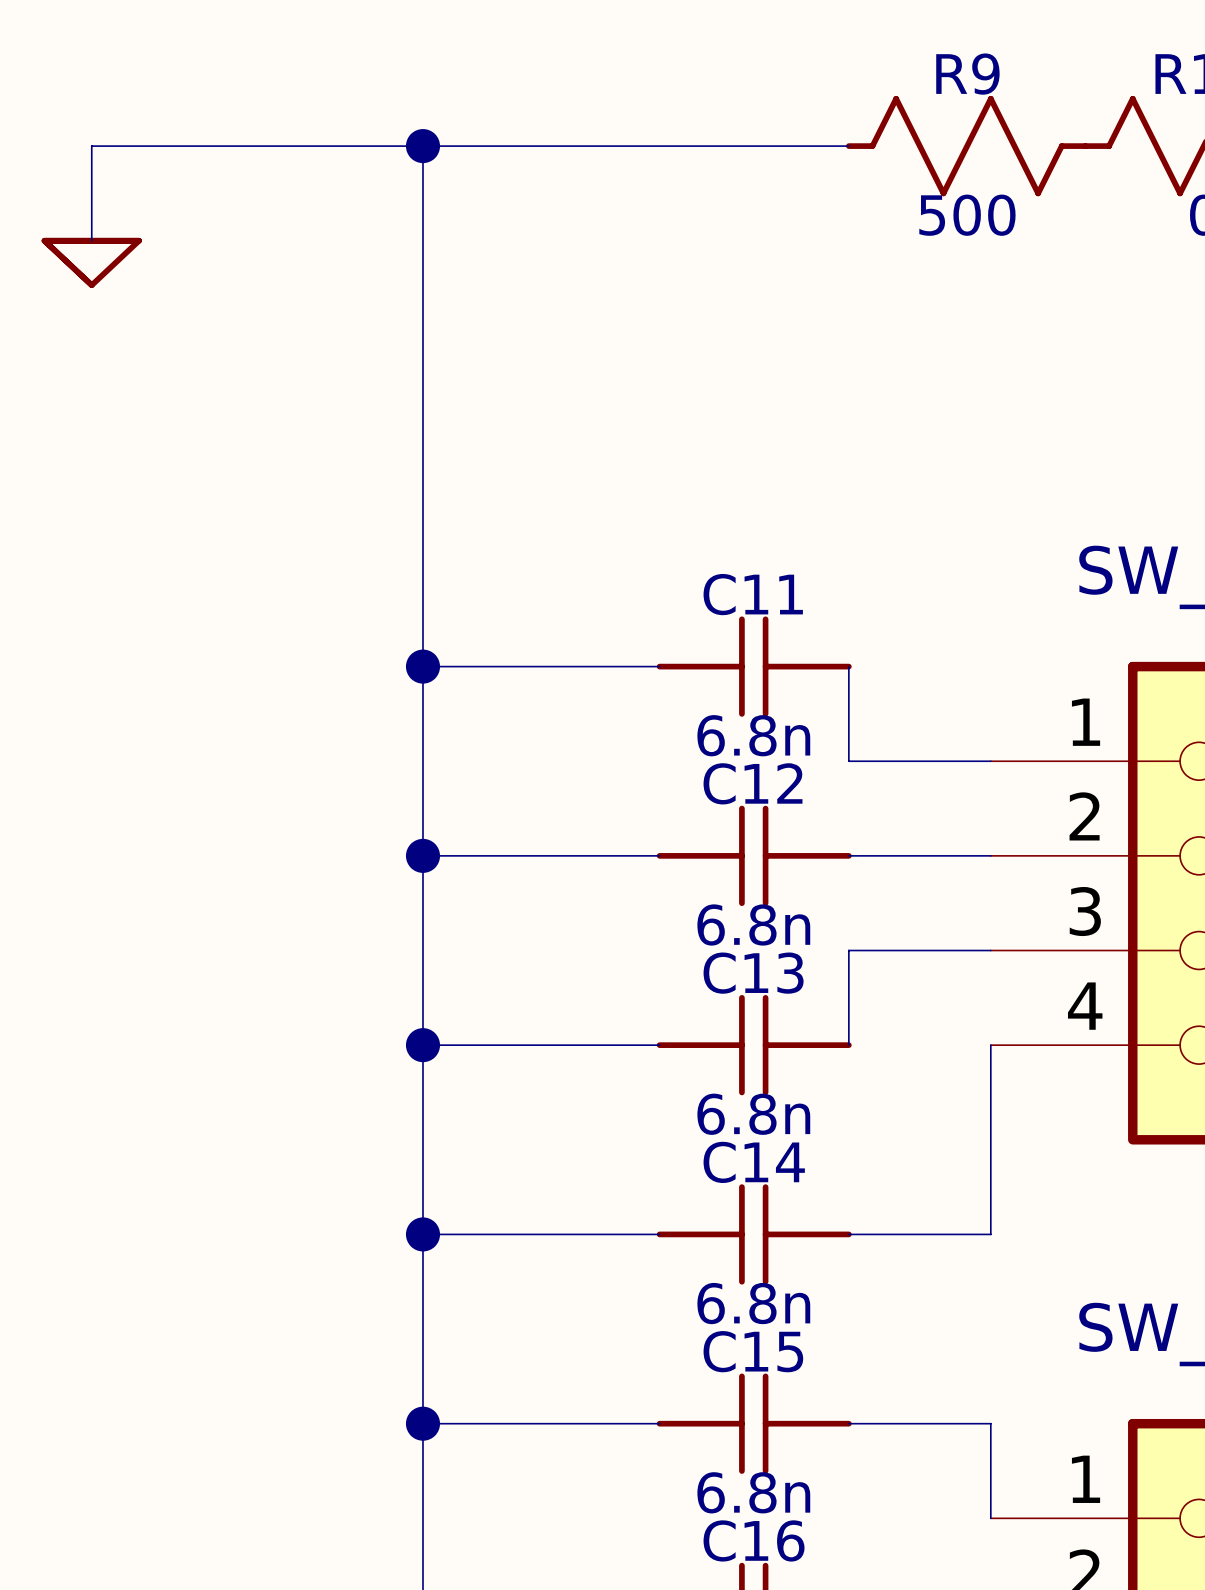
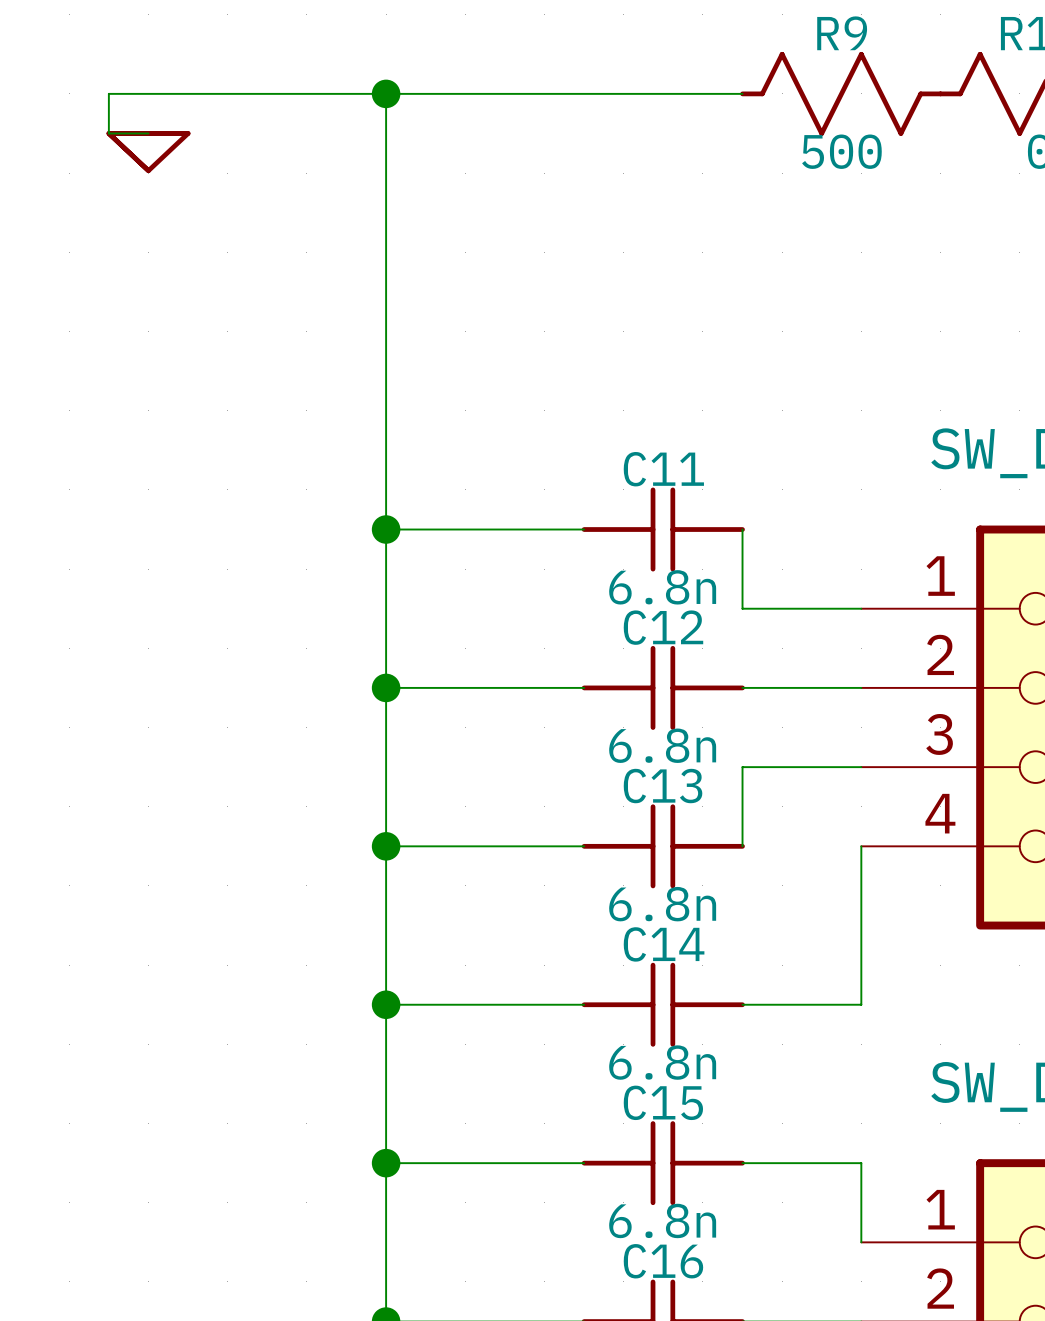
wire: (91, 193) (91, 240) -> (108, 133) (148, 133)
power symbol position: (91, 262) -> (148, 152)

